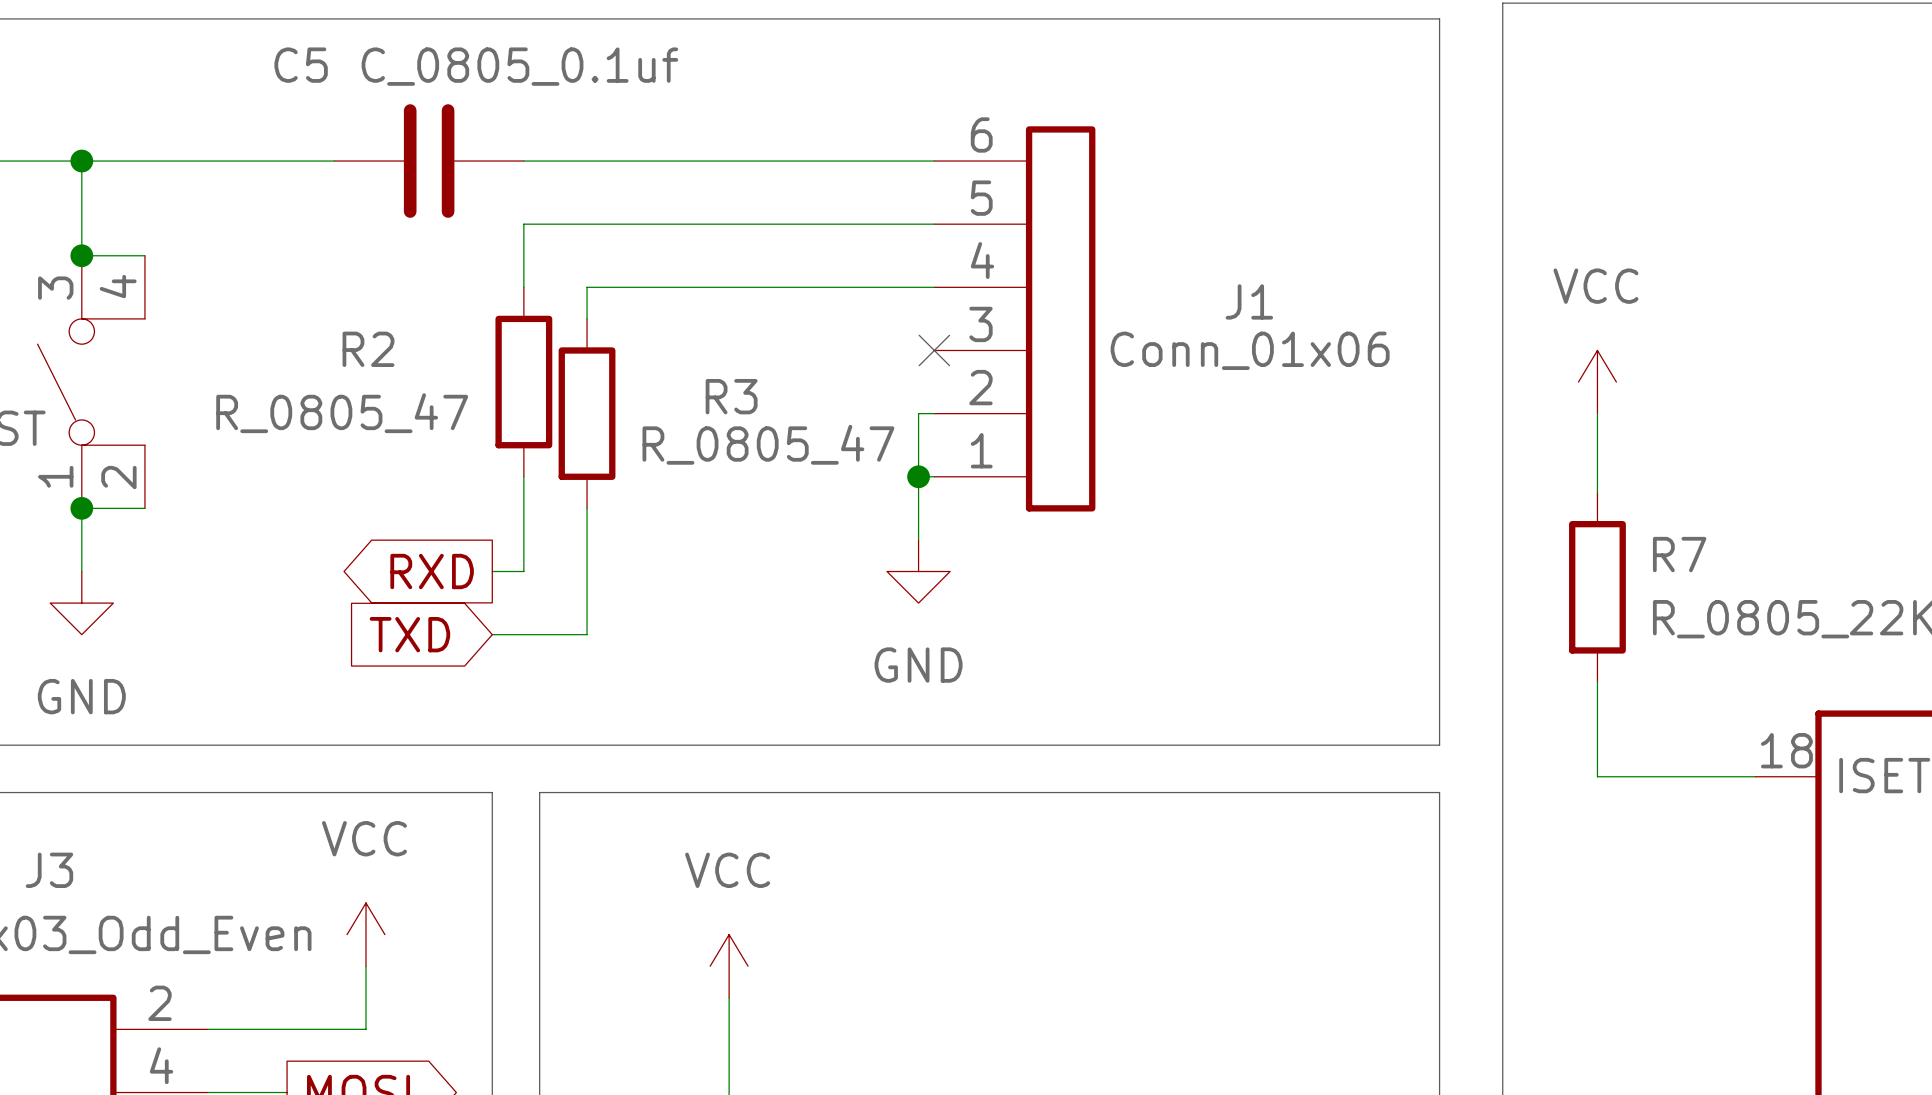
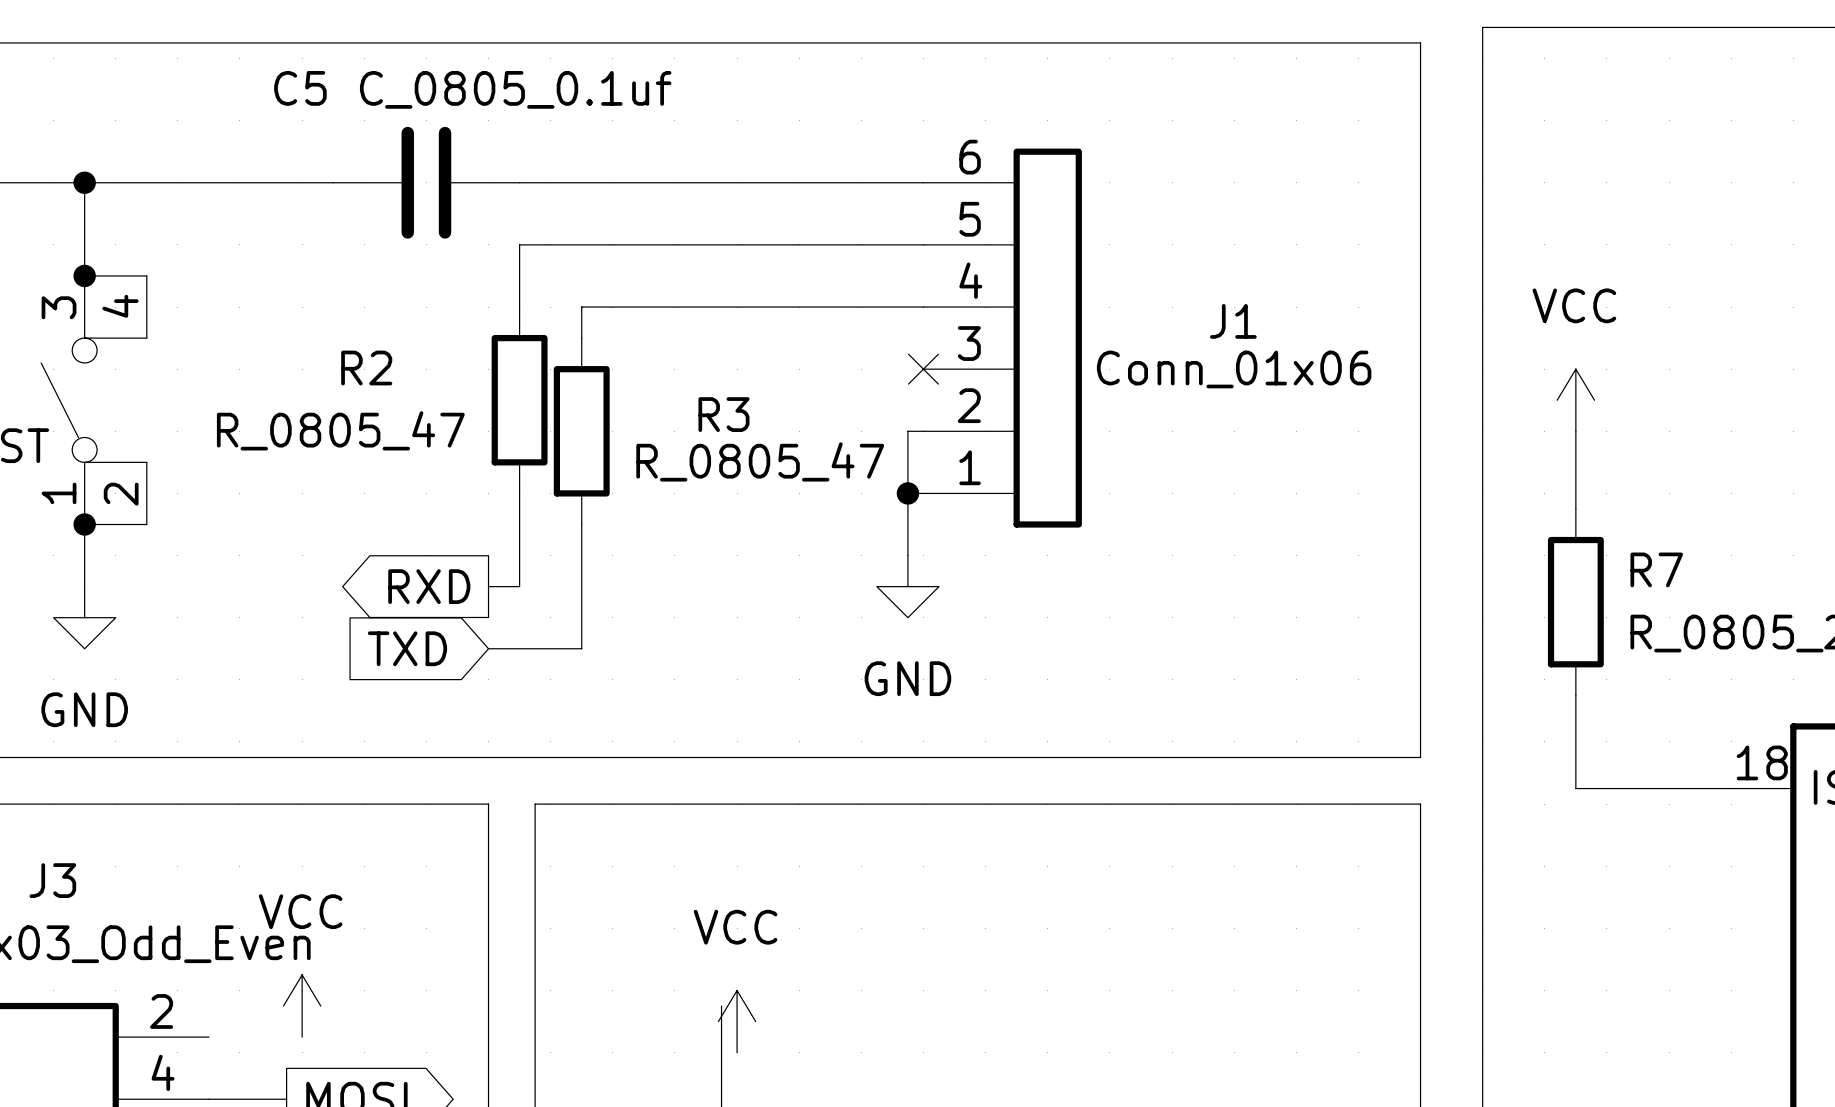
power symbol position: VCC (365, 934) -> VCC (302, 1006)
wire: (365, 966) (365, 1029) (208, 1029) -> none
power symbol position: VCC (729, 966) -> VCC (737, 1021)

